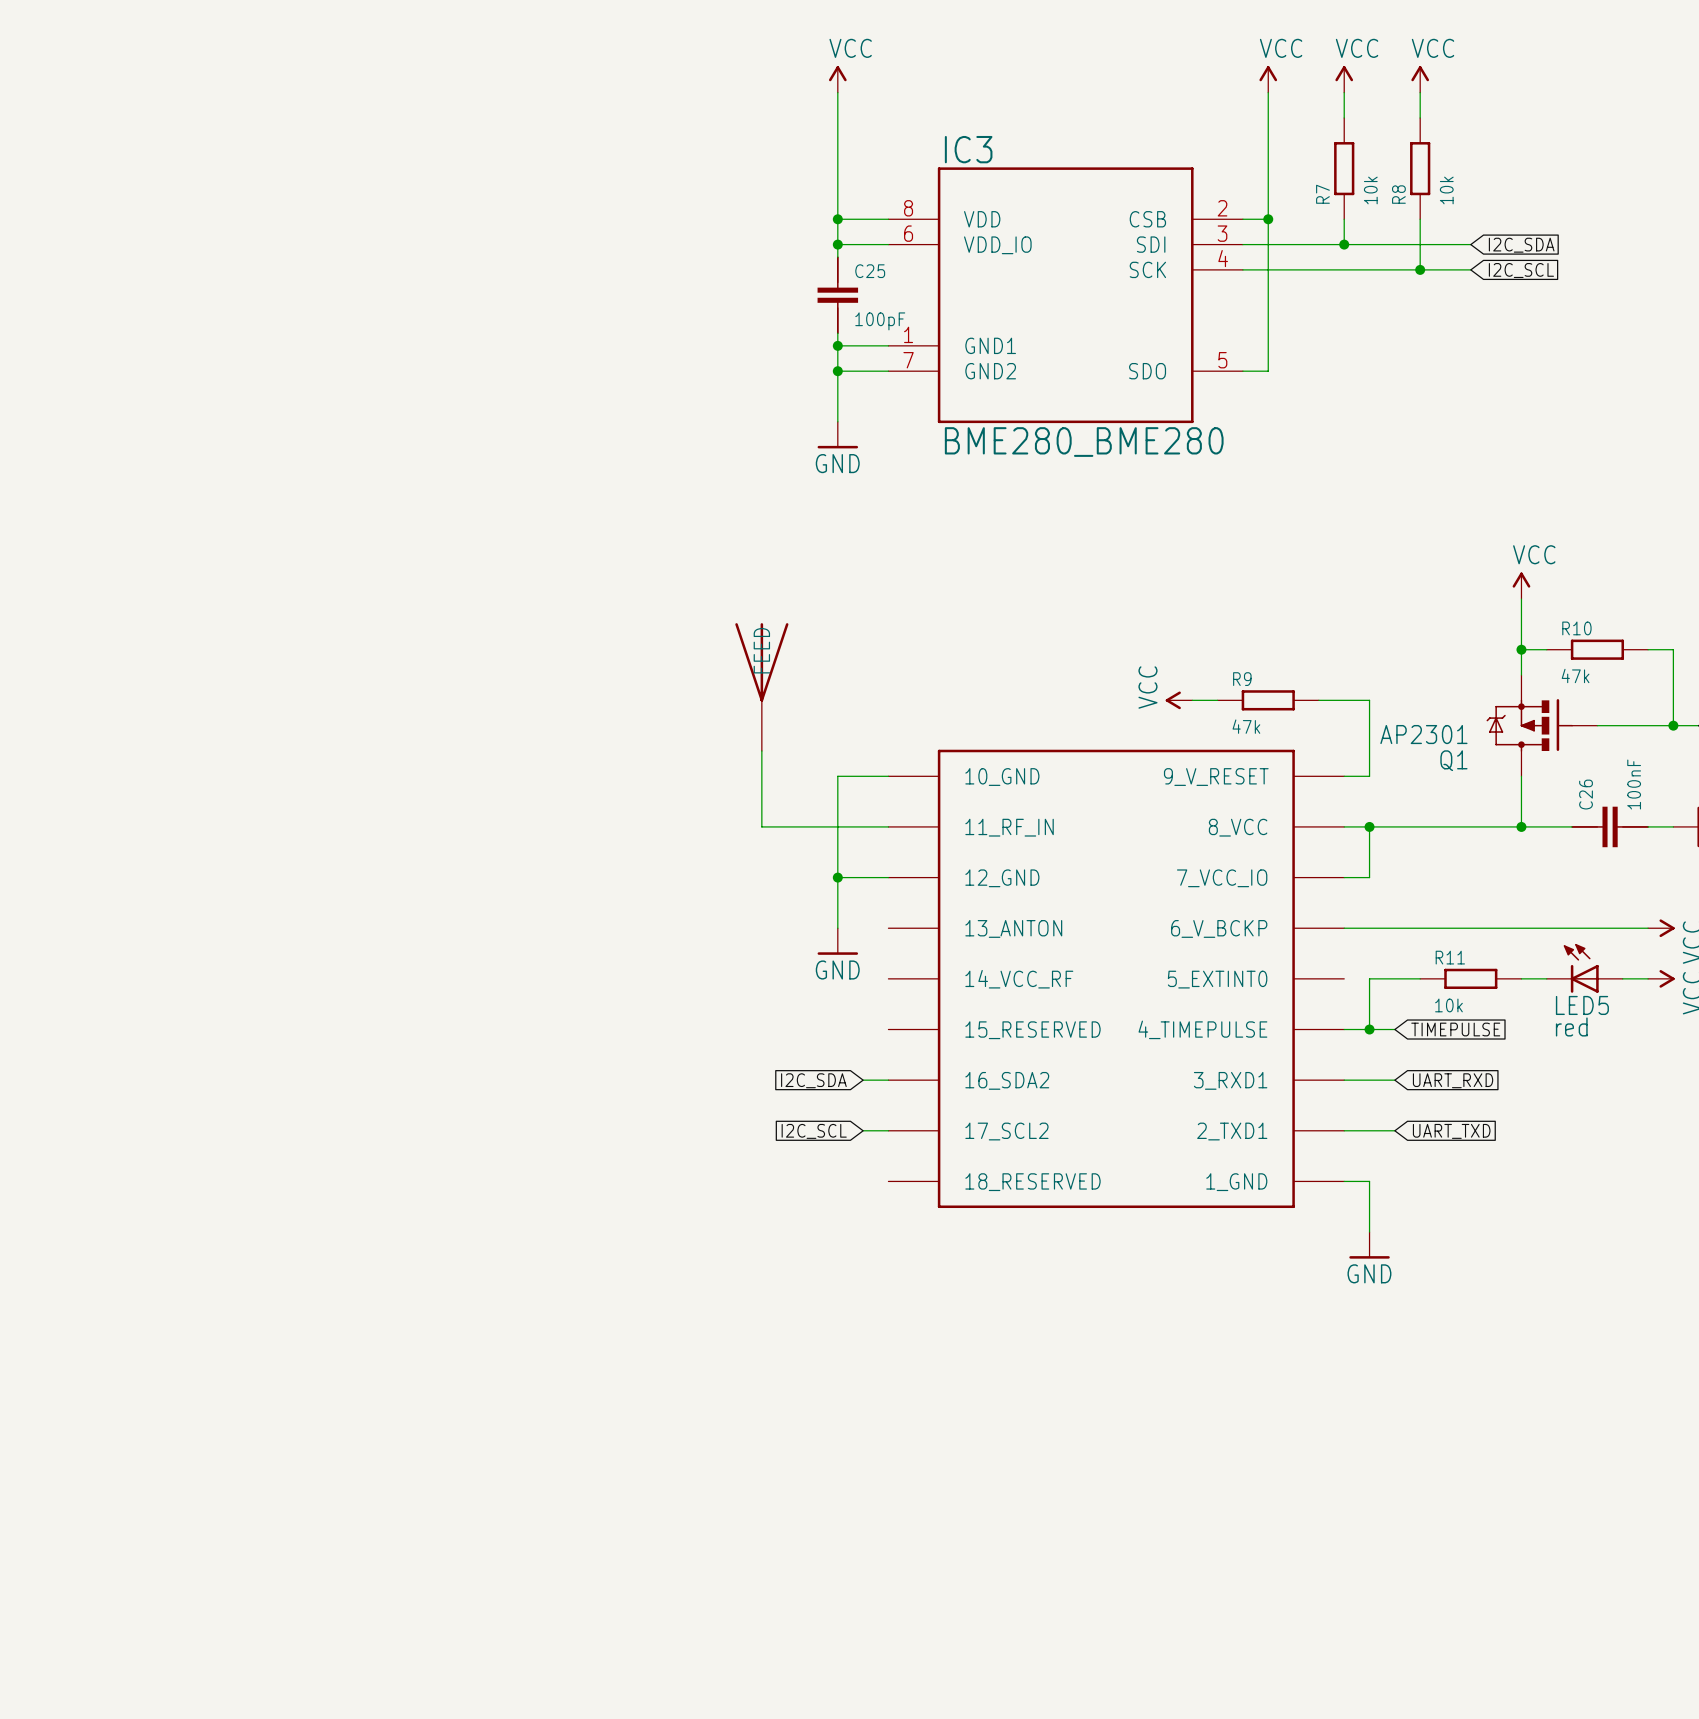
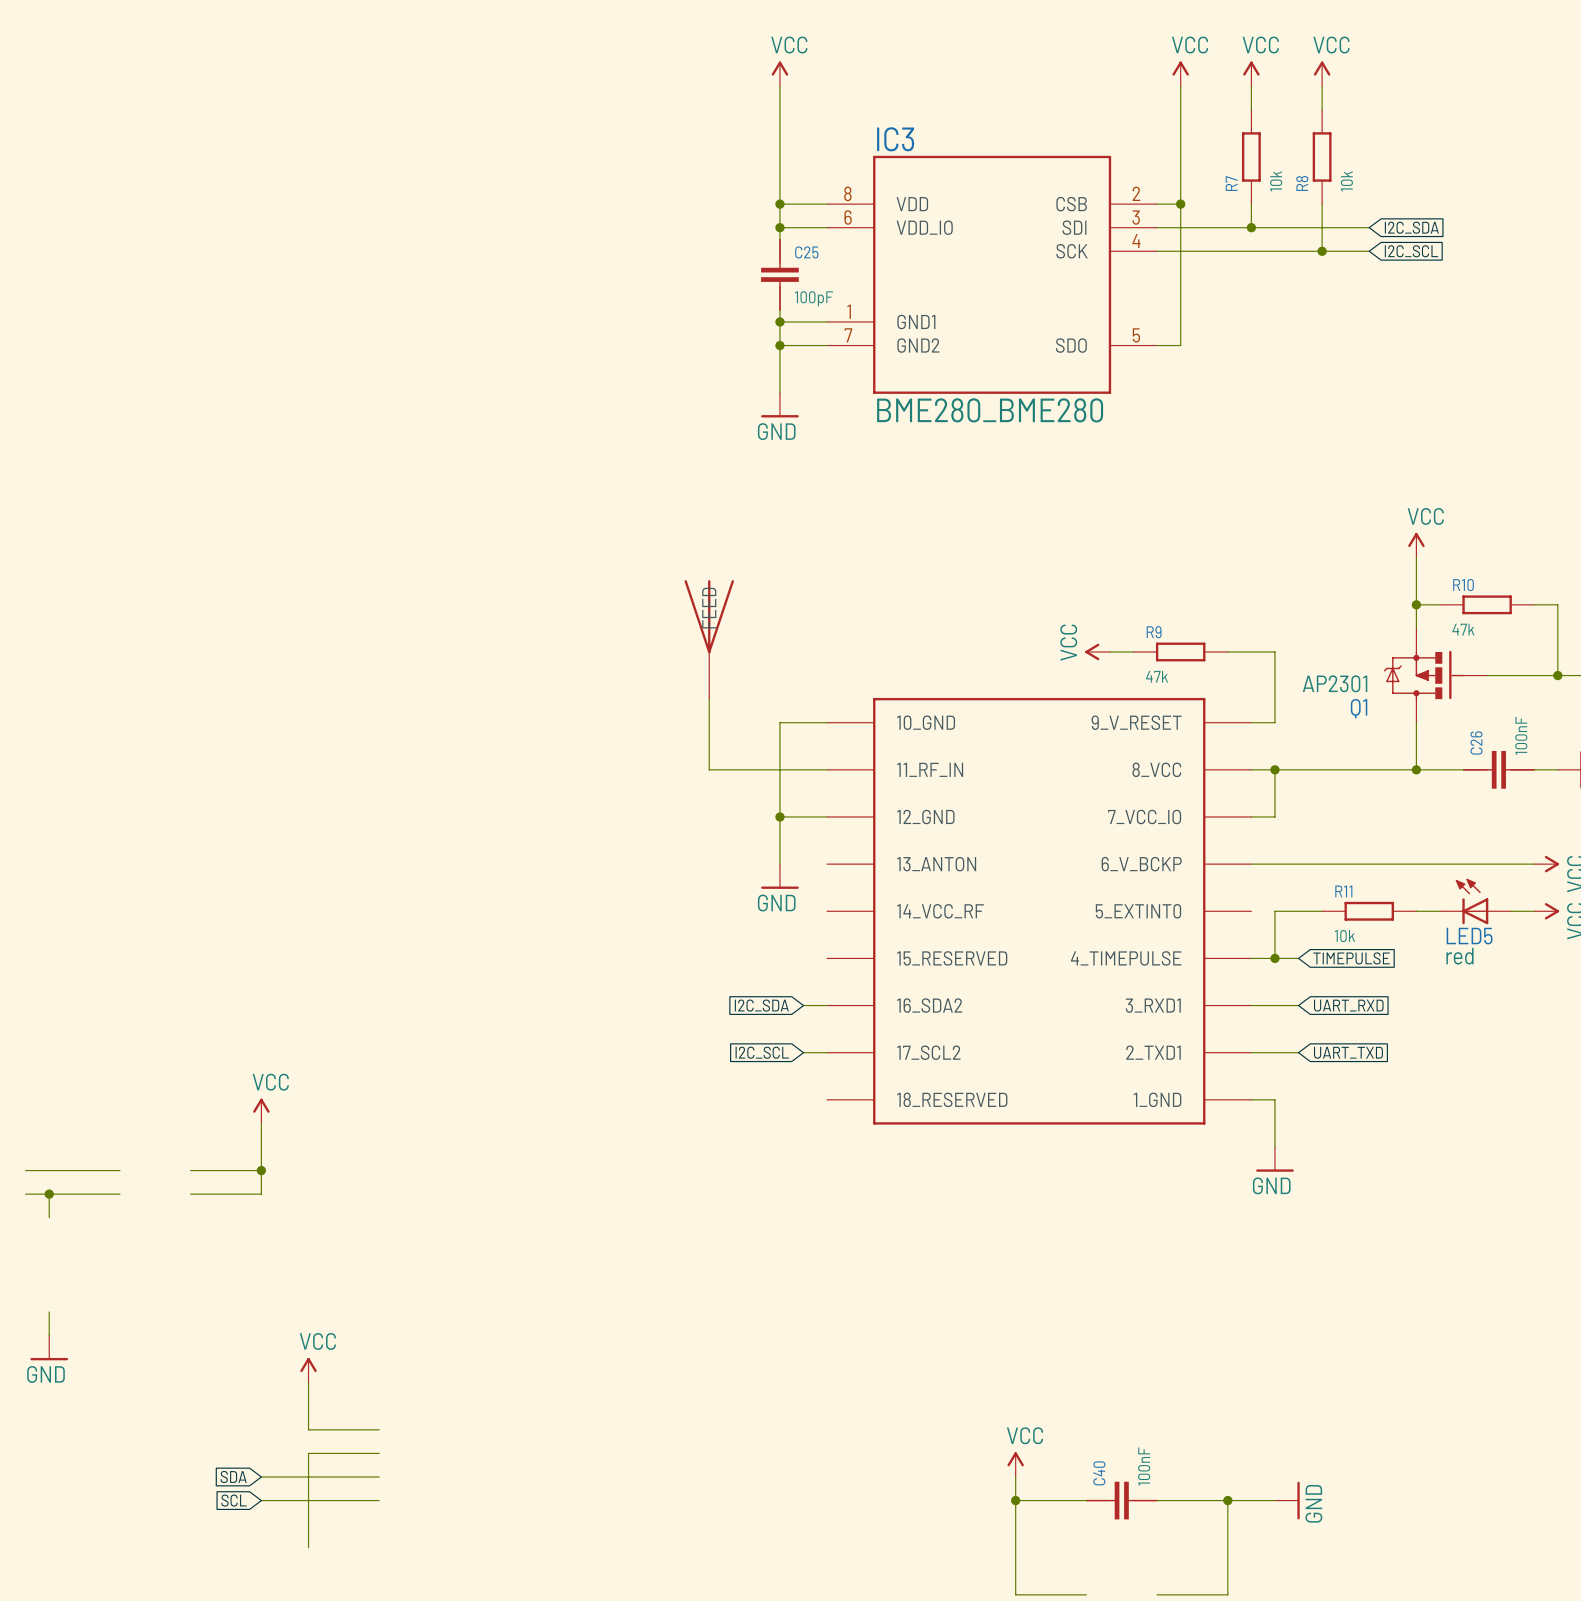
power symbol: none -> VCC (261, 1111)
wire: none -> (261, 1123) (261, 1194) (190, 1194)
wire: none -> (25, 1170) (119, 1170)
wire: none -> (190, 1170) (261, 1170)
junction: none -> (261, 1170)
wire: none -> (25, 1194) (119, 1194)
wire: none -> (49, 1194) (49, 1217)
junction: none -> (49, 1194)
wire: none -> (49, 1311) (49, 1335)
power symbol: none -> GND (49, 1347)
power symbol: none -> VCC (308, 1370)
wire: none -> (308, 1382) (308, 1429) (379, 1429)
wire: none -> (379, 1453) (308, 1453) (308, 1547)
power symbol: none -> VCC (1015, 1464)
global label: none -> SDA (233, 1476)
wire: none -> (261, 1476) (379, 1476)
wire: none -> (1015, 1476) (1015, 1594) (1086, 1594)
global label: none -> SCL (234, 1500)
wire: none -> (261, 1500) (379, 1500)
wire: none -> (1015, 1500) (1086, 1500)
junction: none -> (1015, 1500)
C40: none -> 100nF (1121, 1500)
wire: none -> (1157, 1500) (1274, 1500)
wire: none -> (1227, 1500) (1227, 1594) (1157, 1594)
junction: none -> (1227, 1500)
power symbol: none -> GND (1287, 1500)

